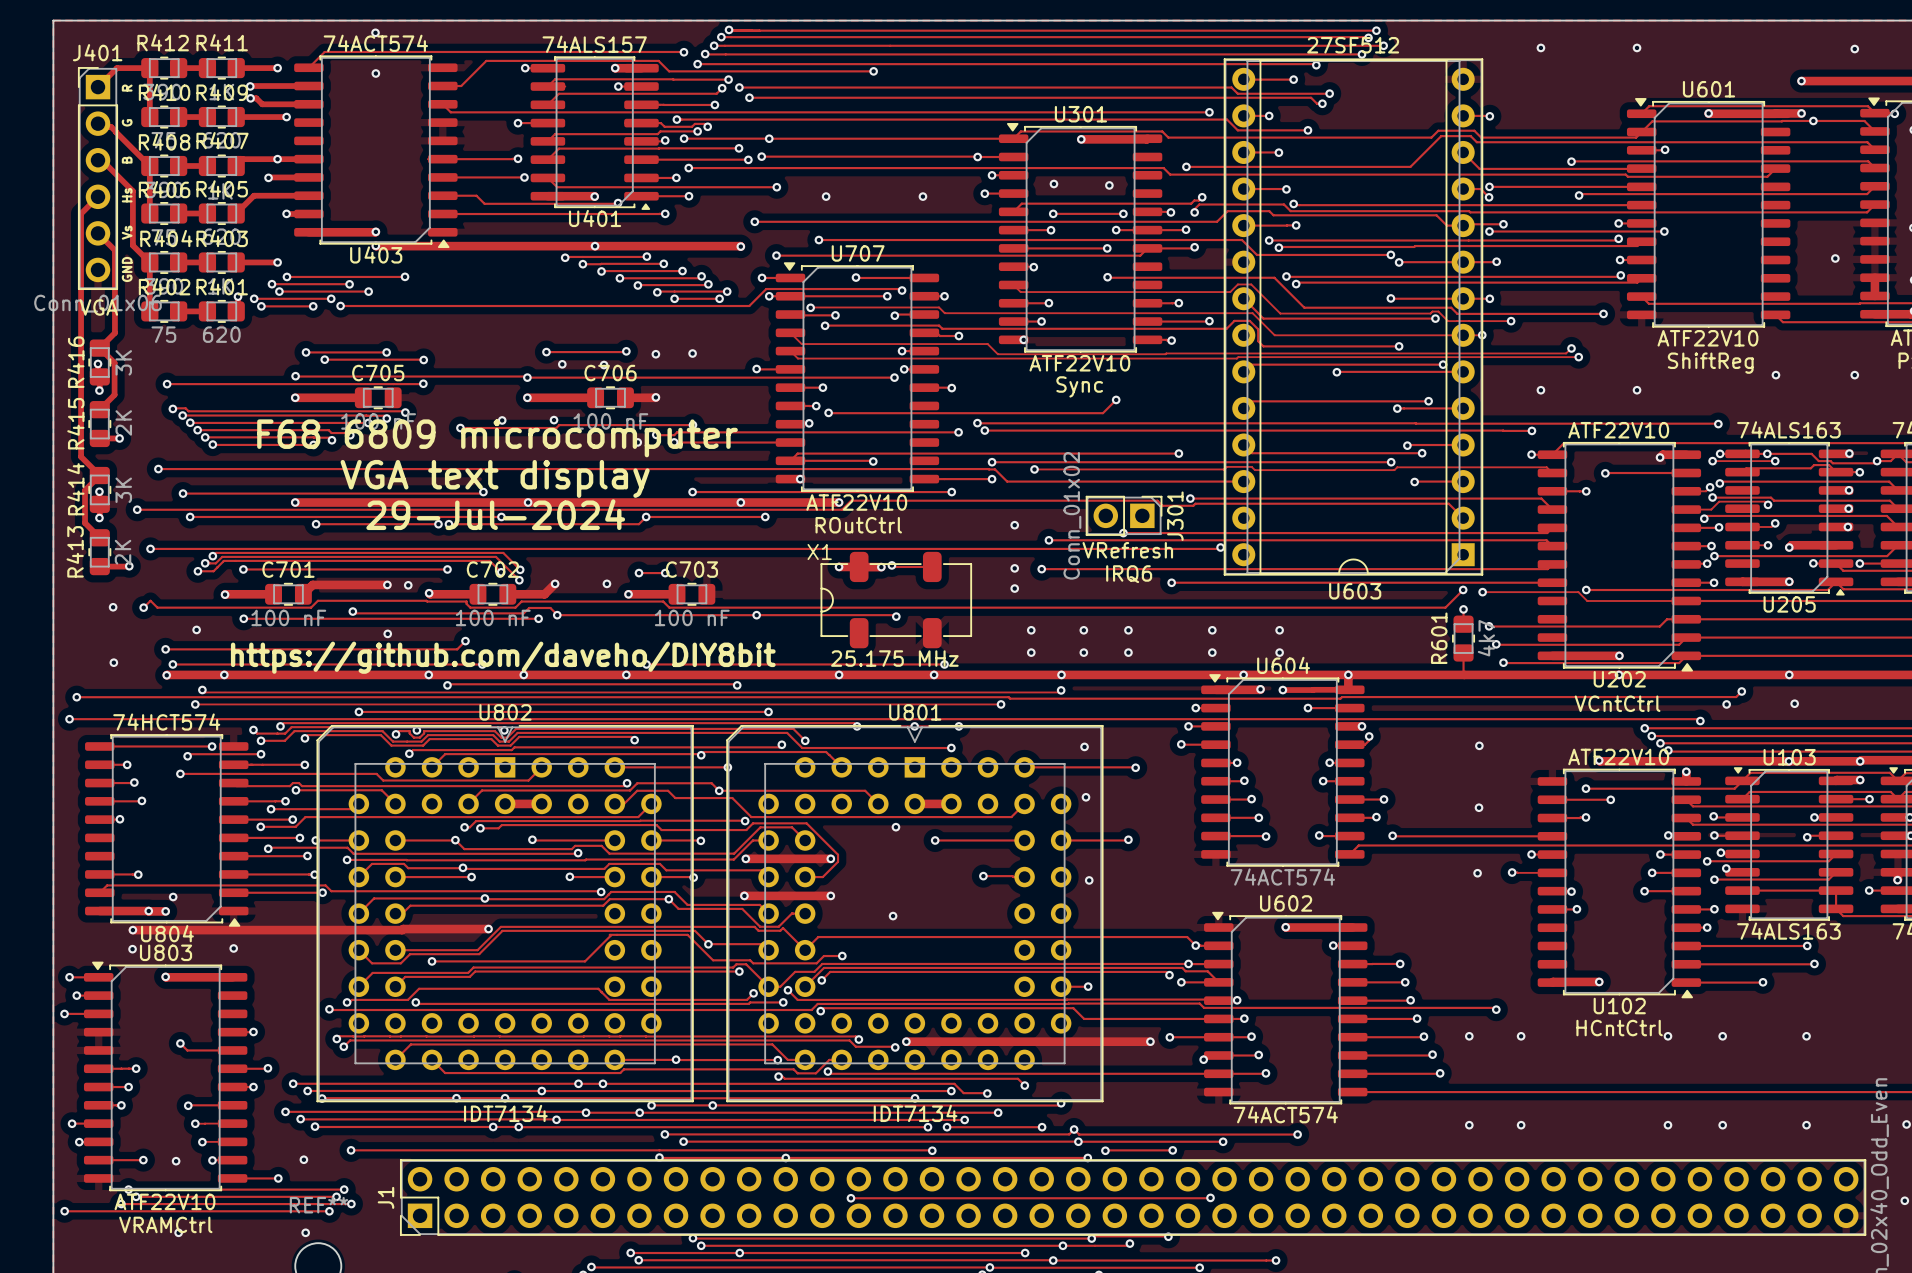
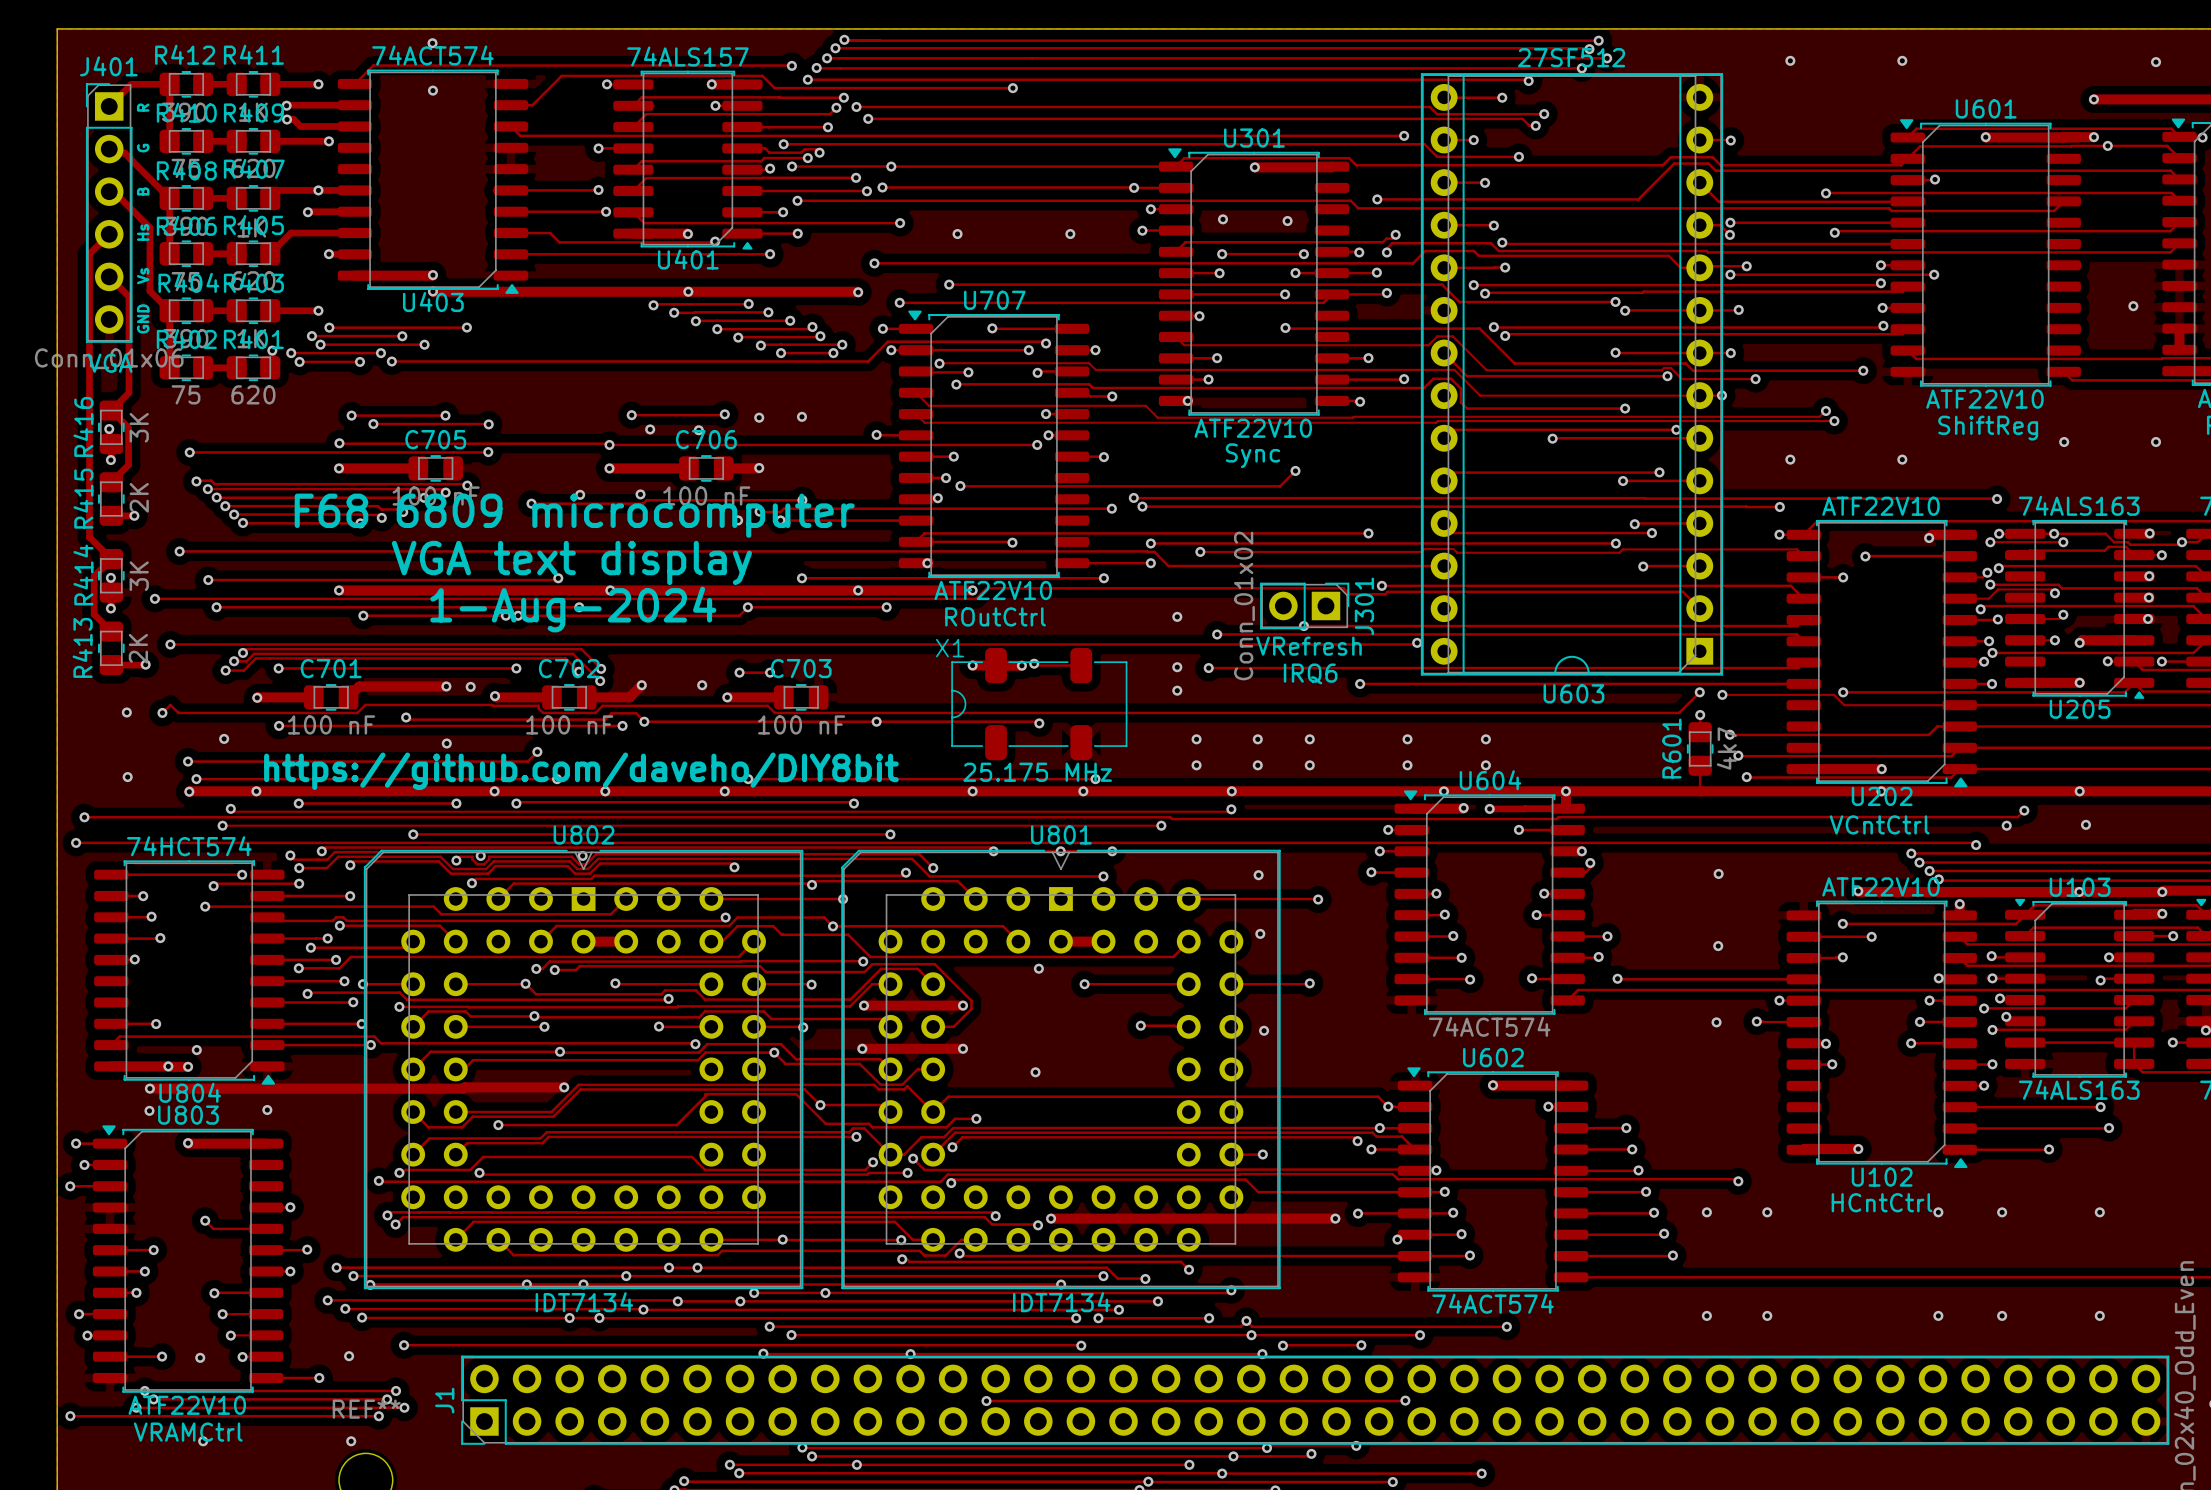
text: 29-Jul-2024 (495, 514) -> 1-Aug-2024 (573, 609)
track: none -> (298, 803) (456, 803)
via: none -> (298, 803)
via: none -> (456, 803)

